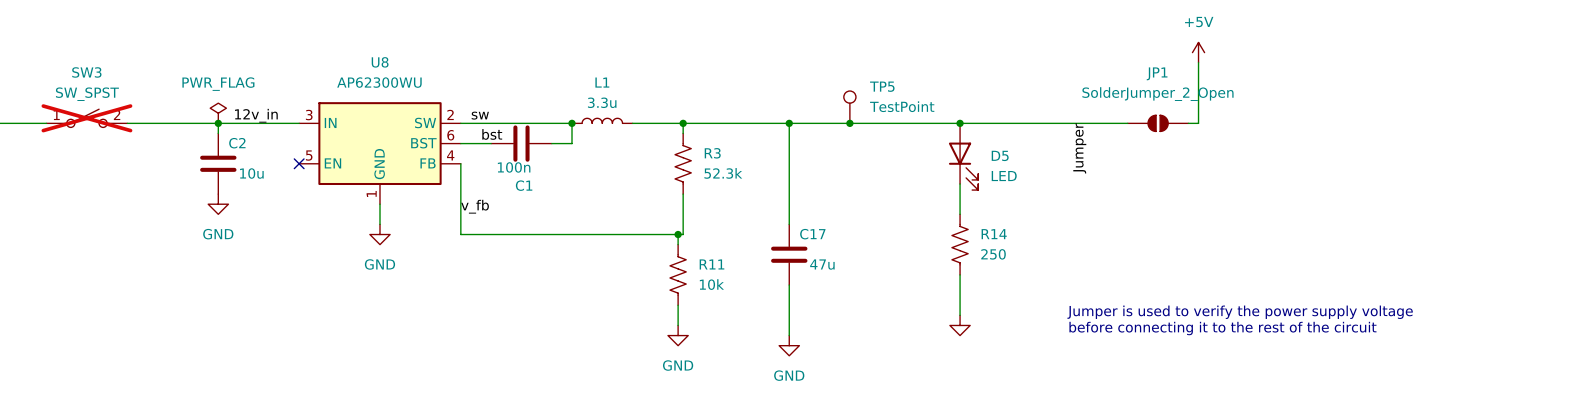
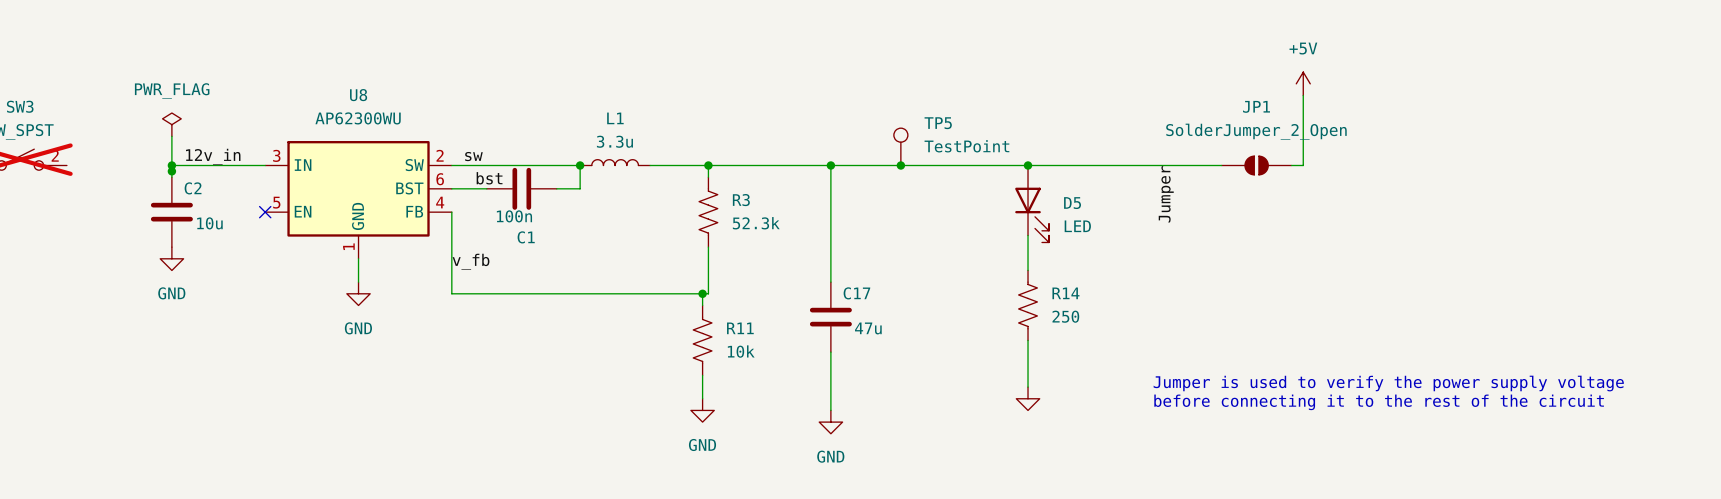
power symbol position: PWR_FLAG (218, 113) -> PWR_FLAG (171, 124)
wire: (127, 123) (218, 123) -> (171, 136) (171, 165)
junction: none -> (171, 171)

